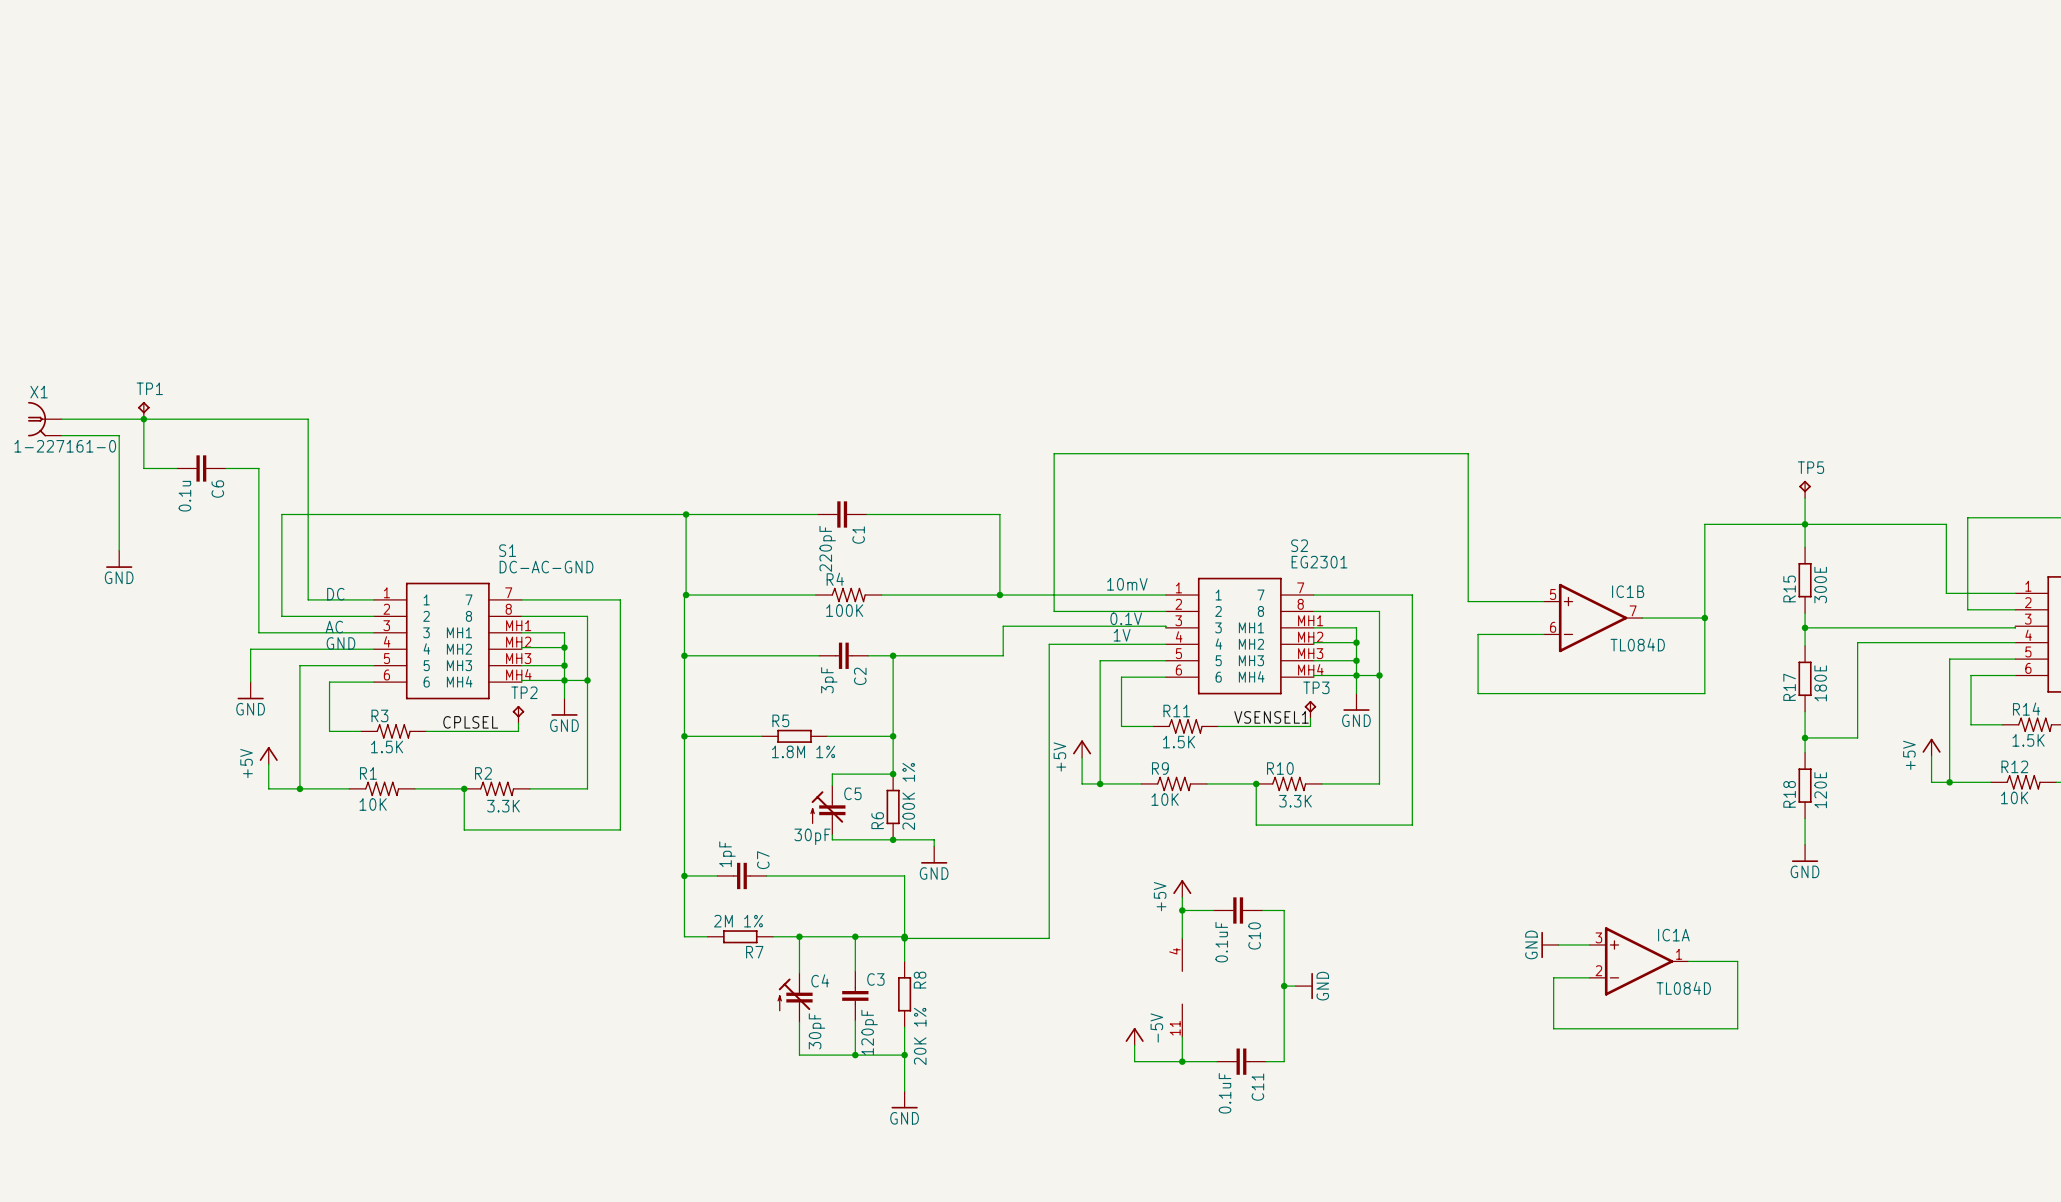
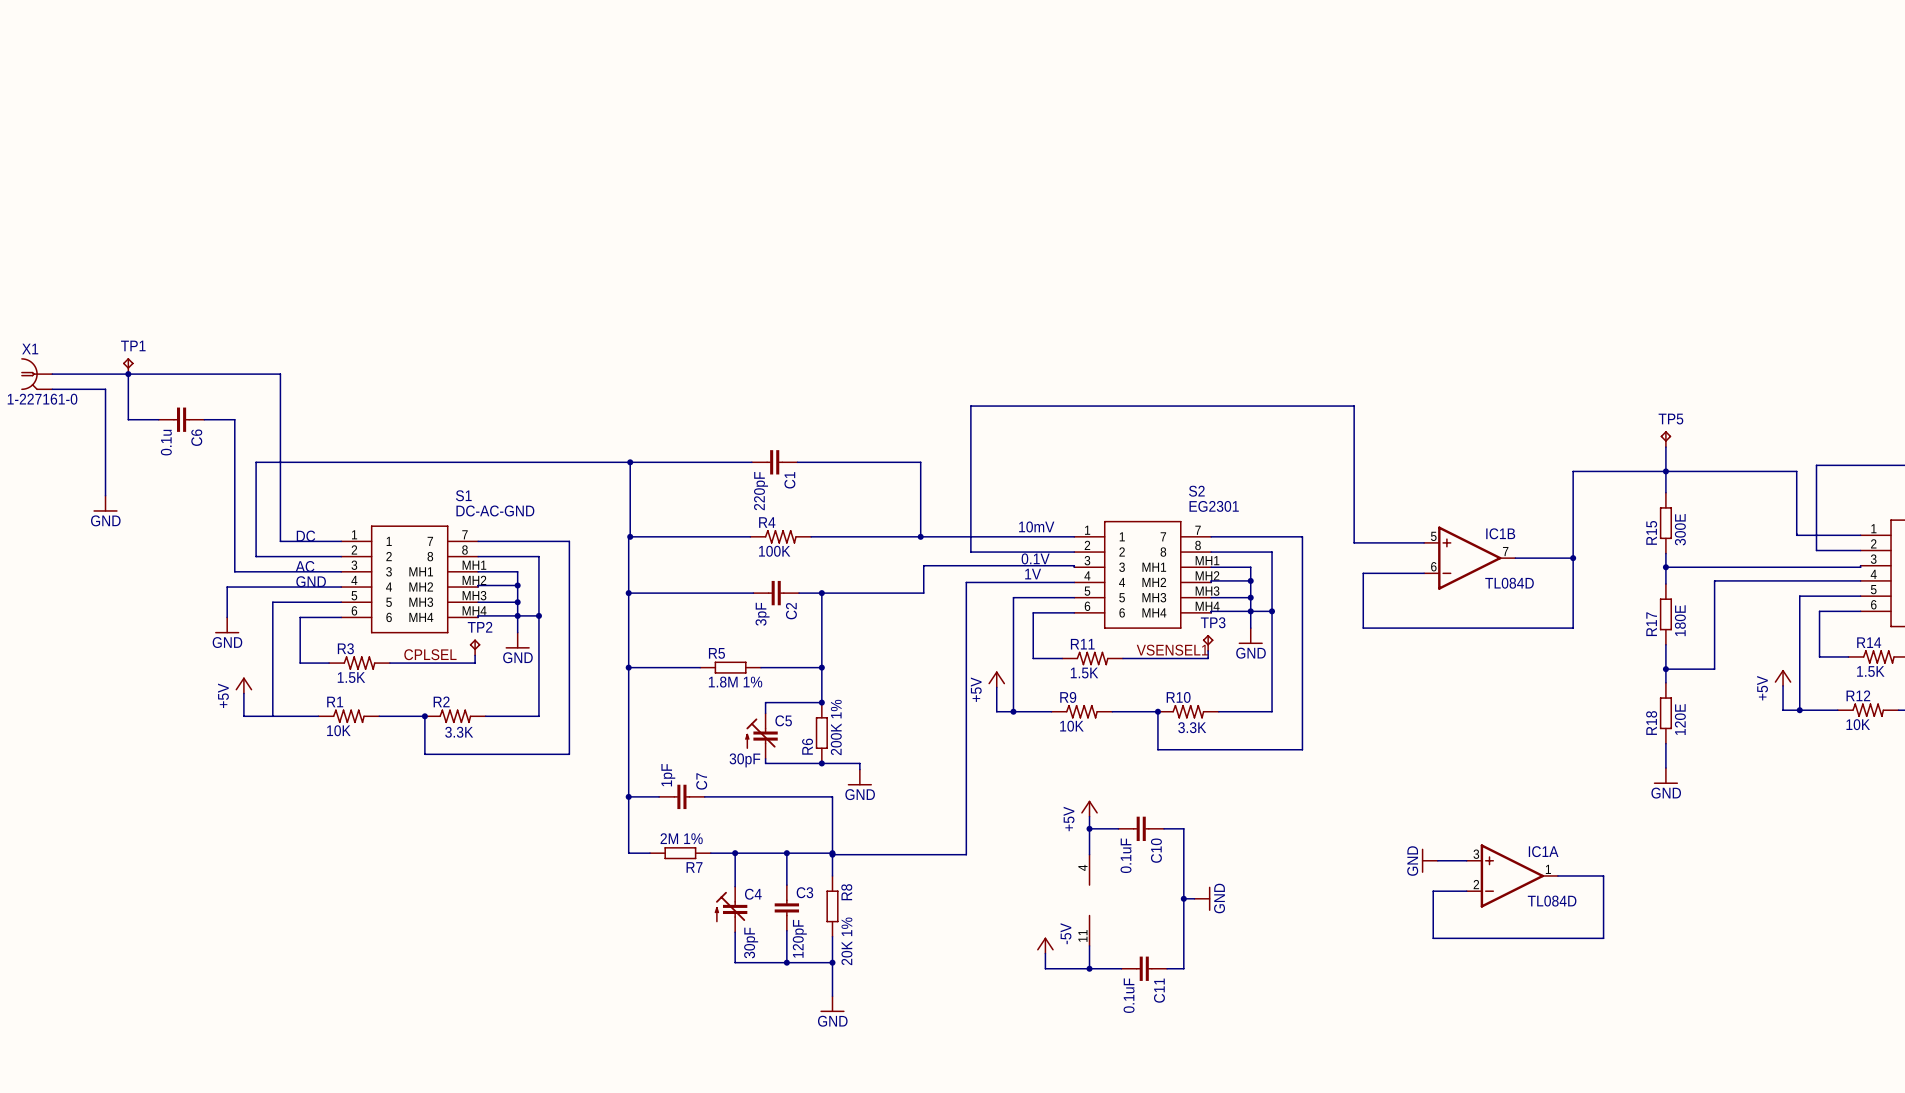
junction: (299, 788) -> none

